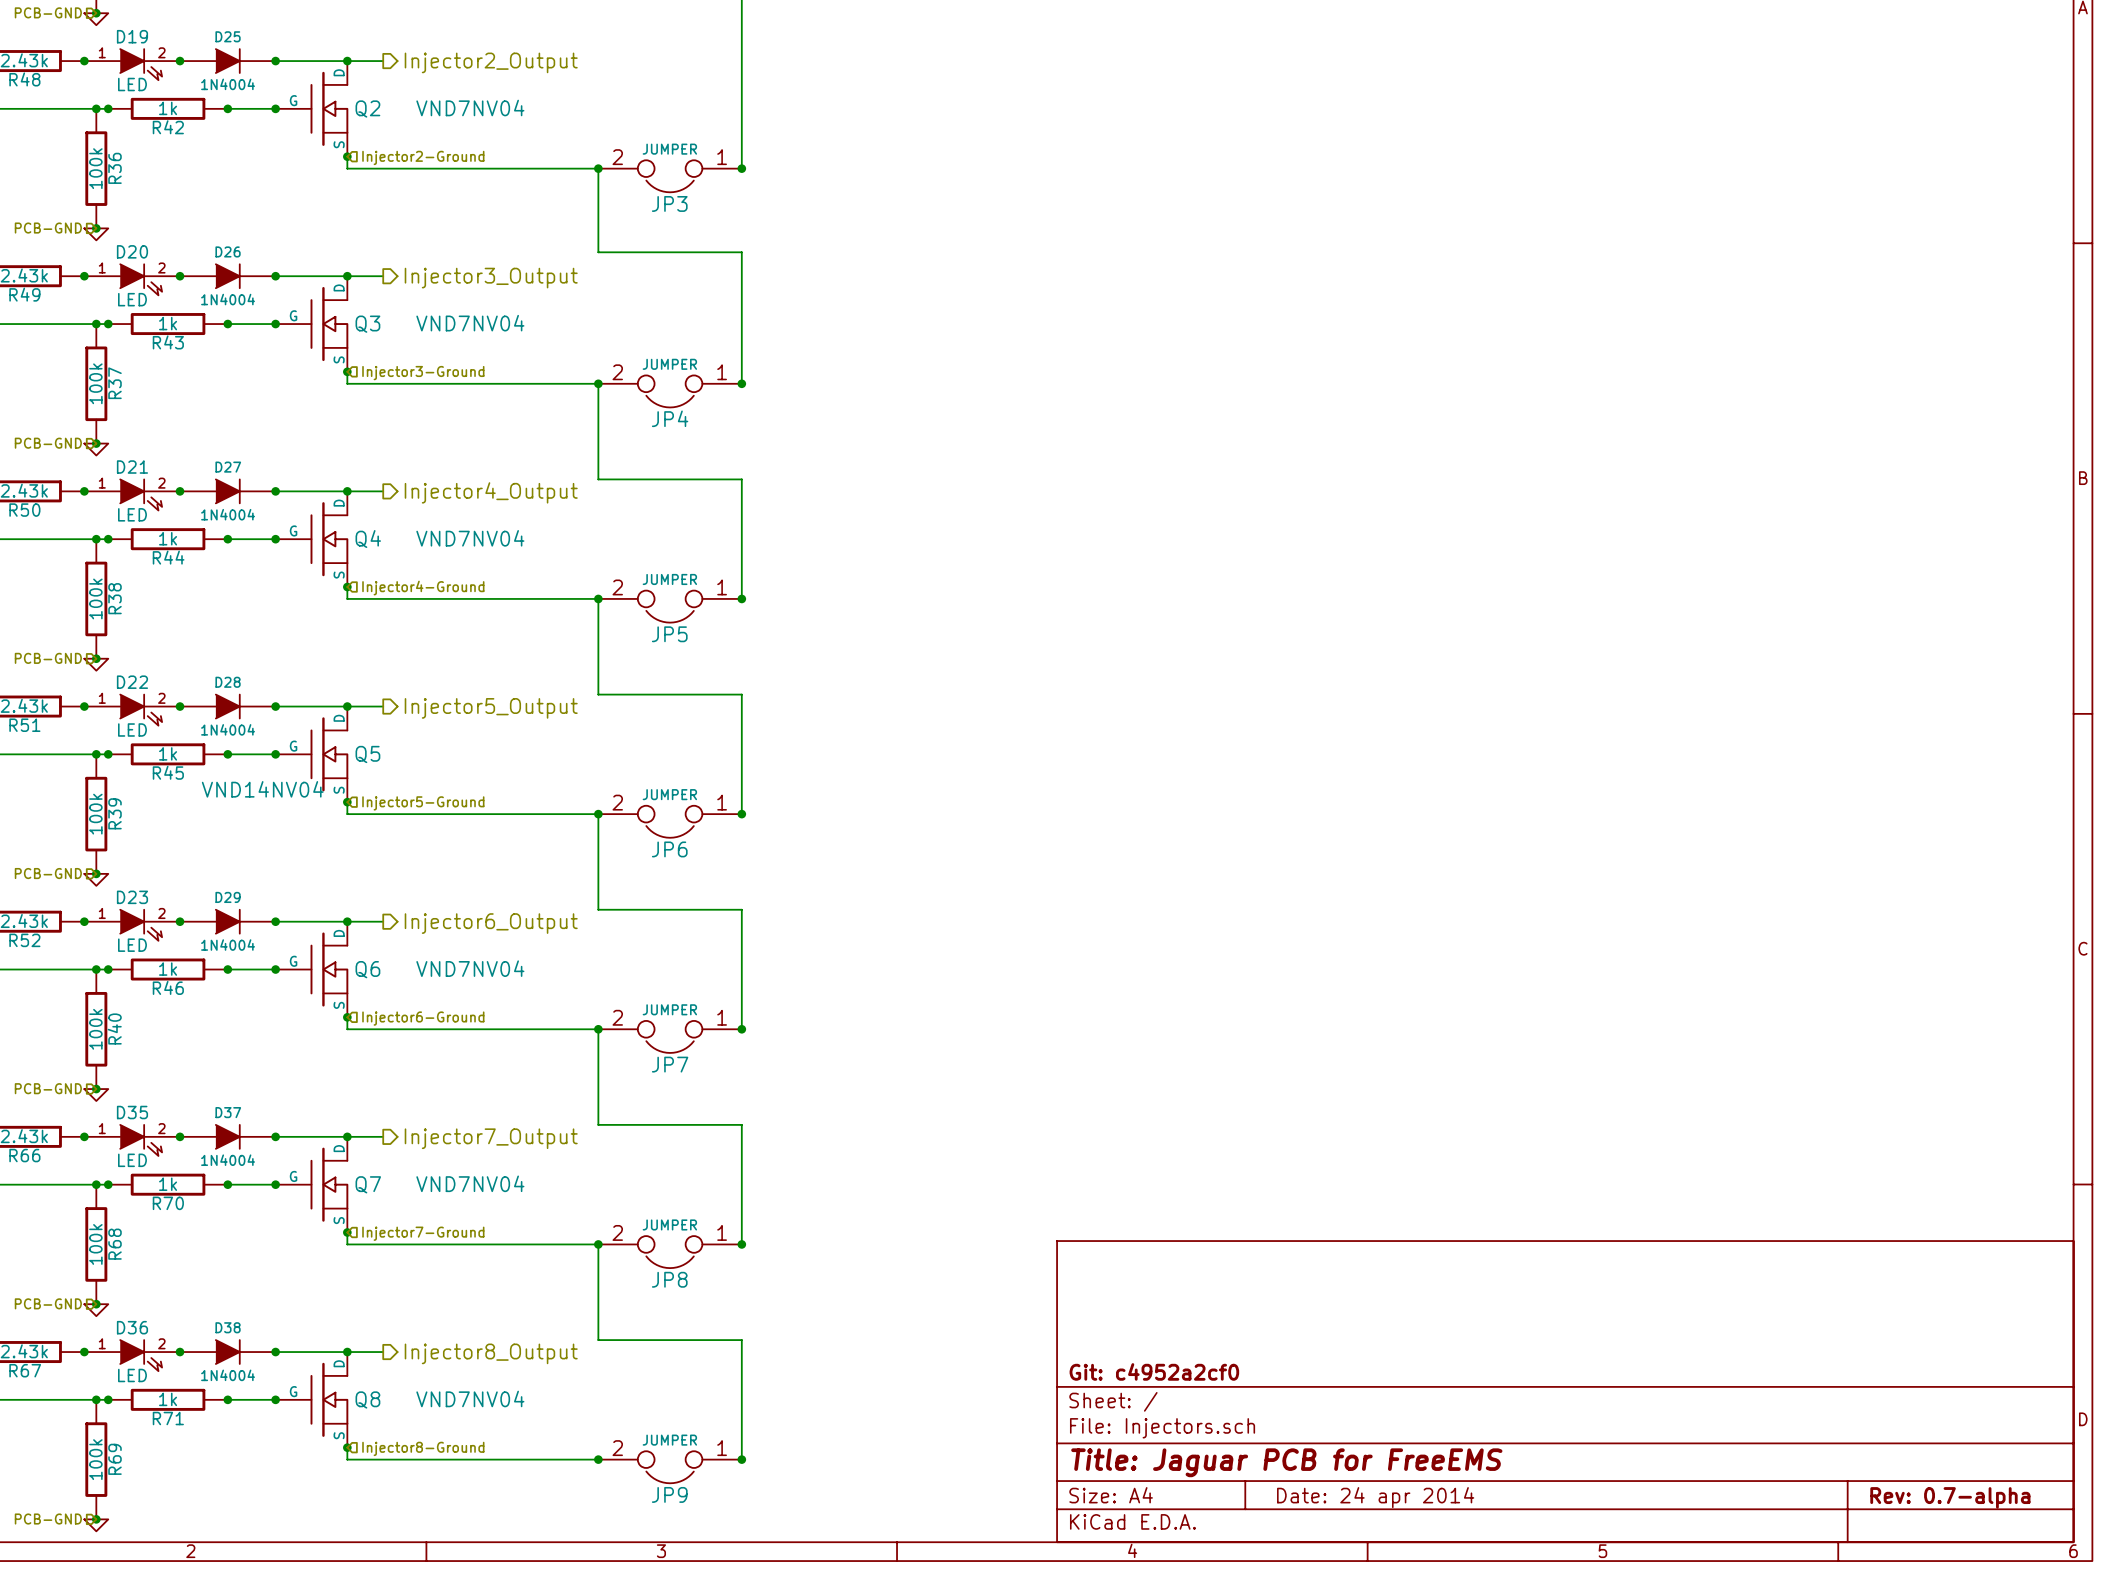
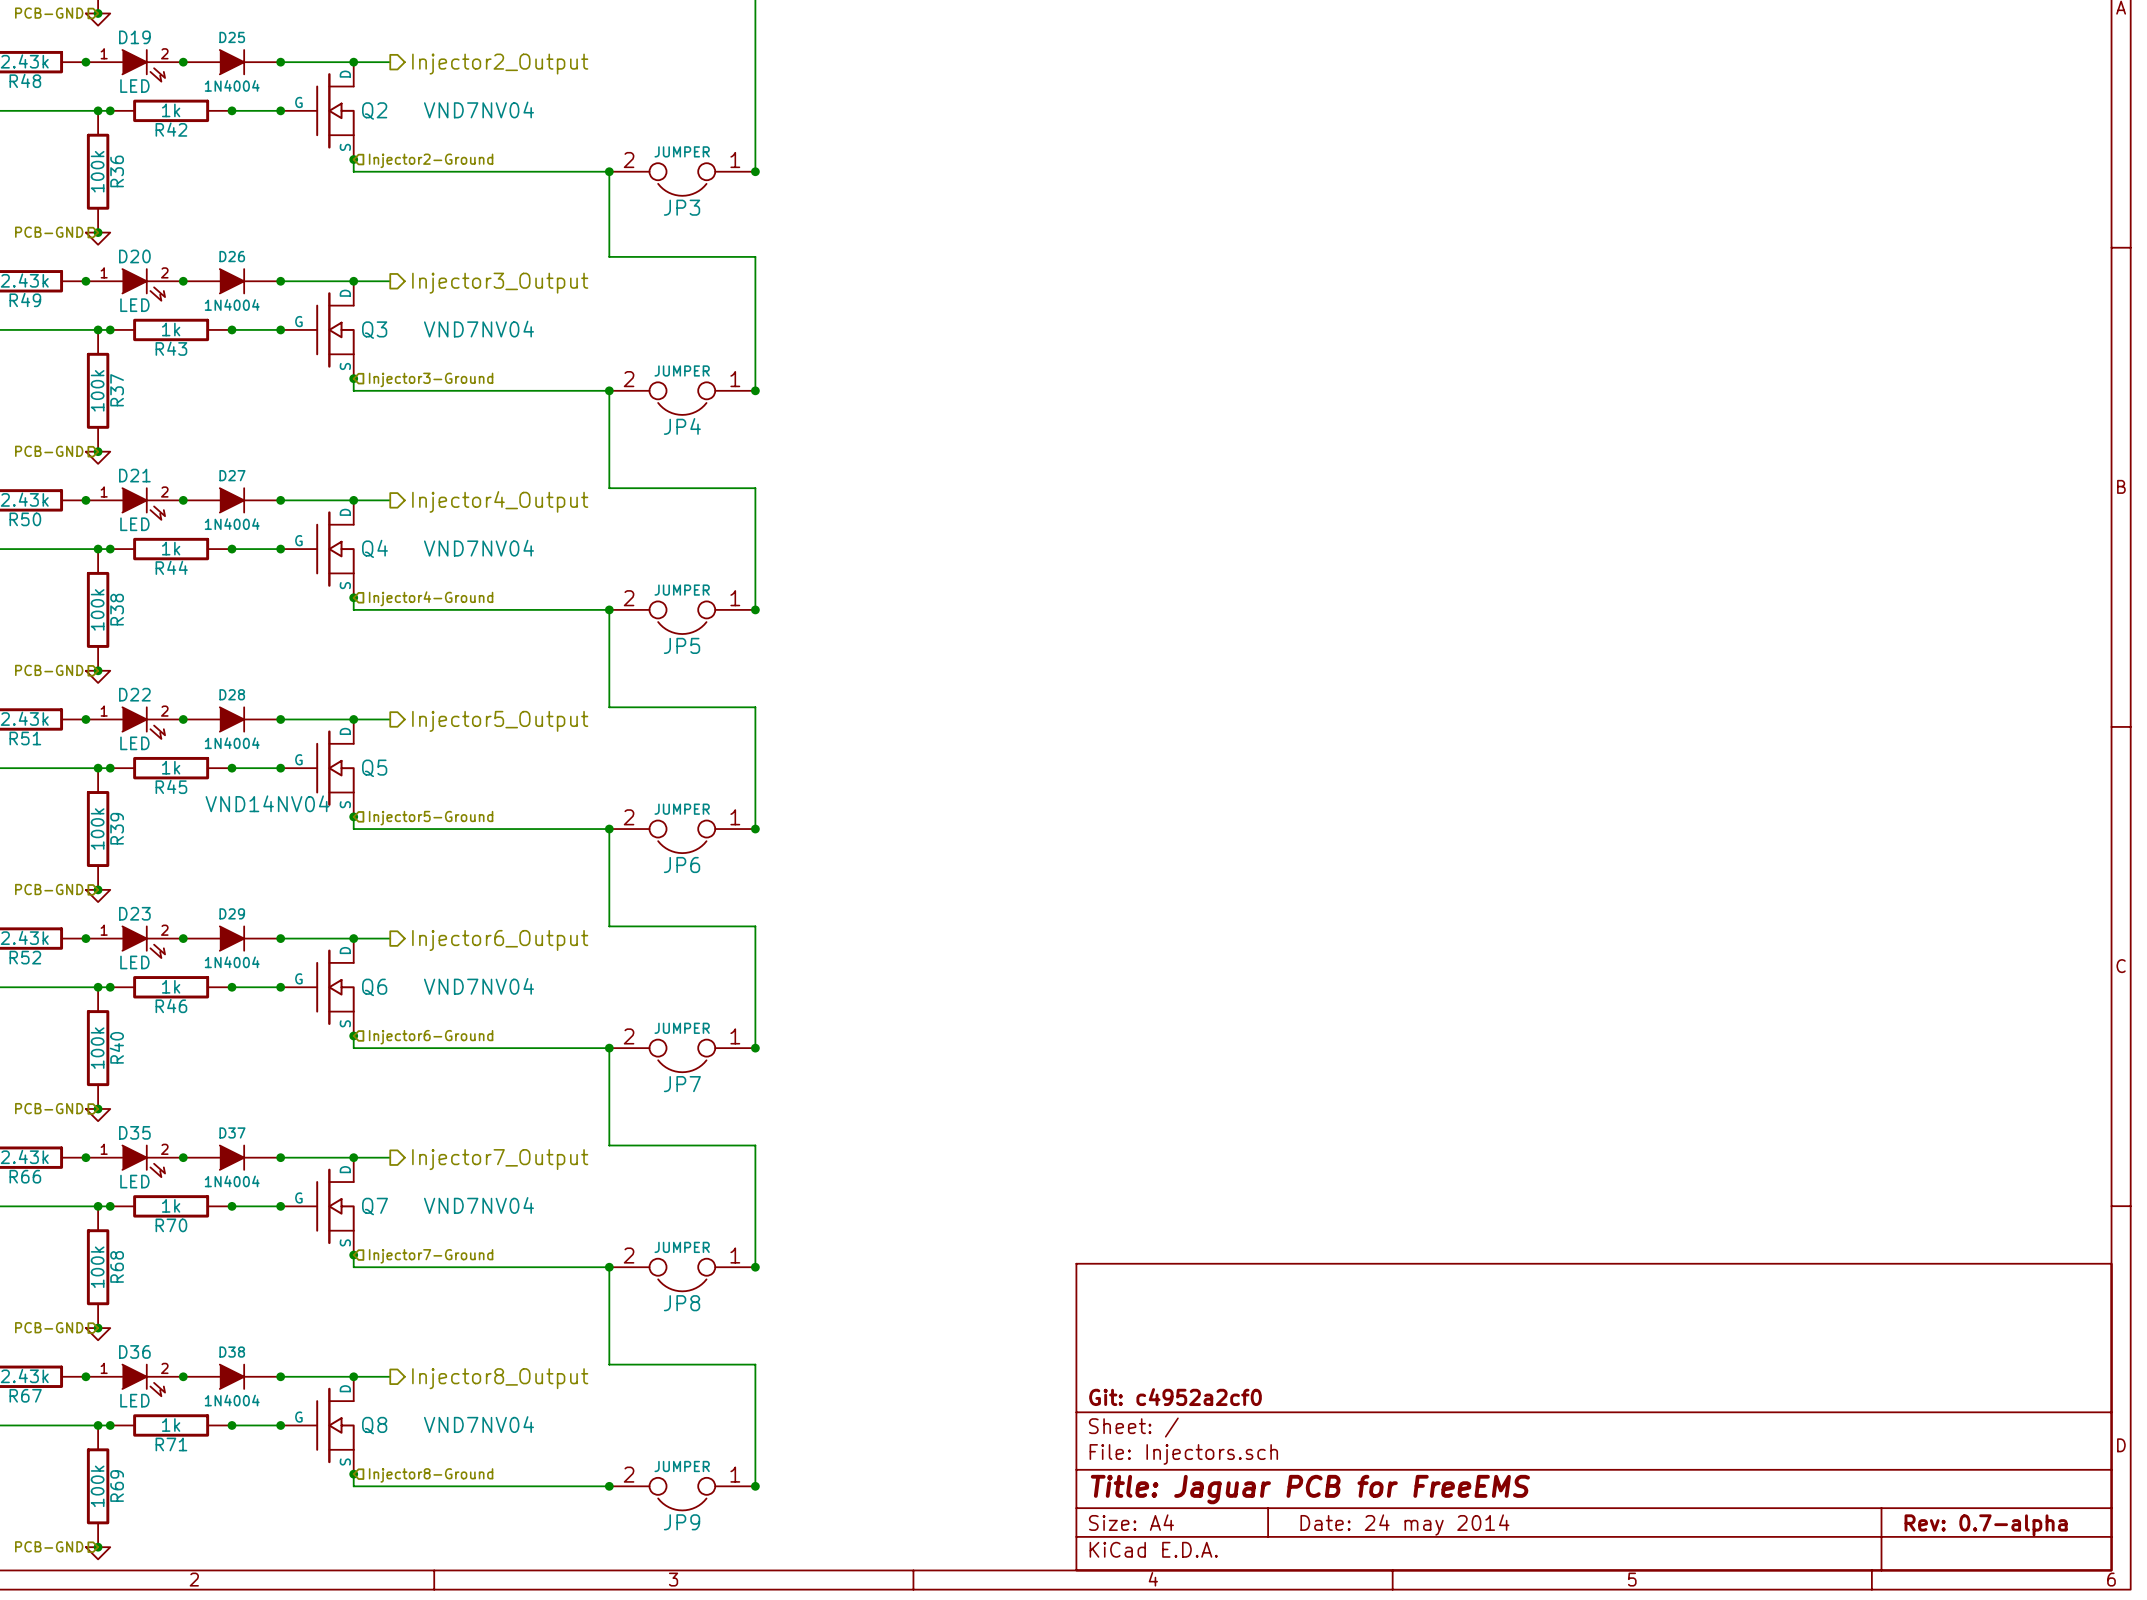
title block: Date: 24 apr 2014 (1375, 1497) -> Date: 24 may 2014 (1404, 1525)

